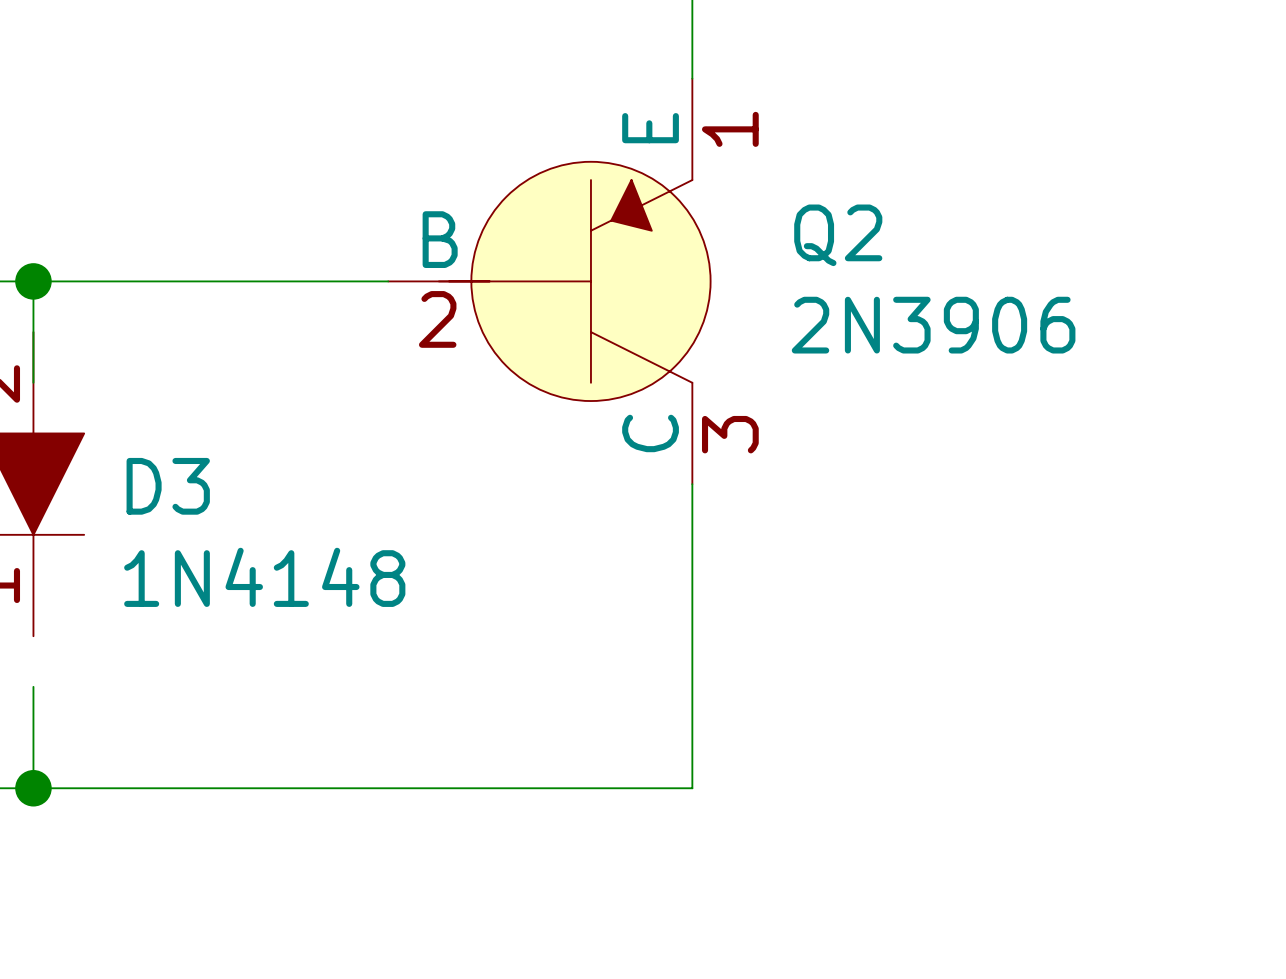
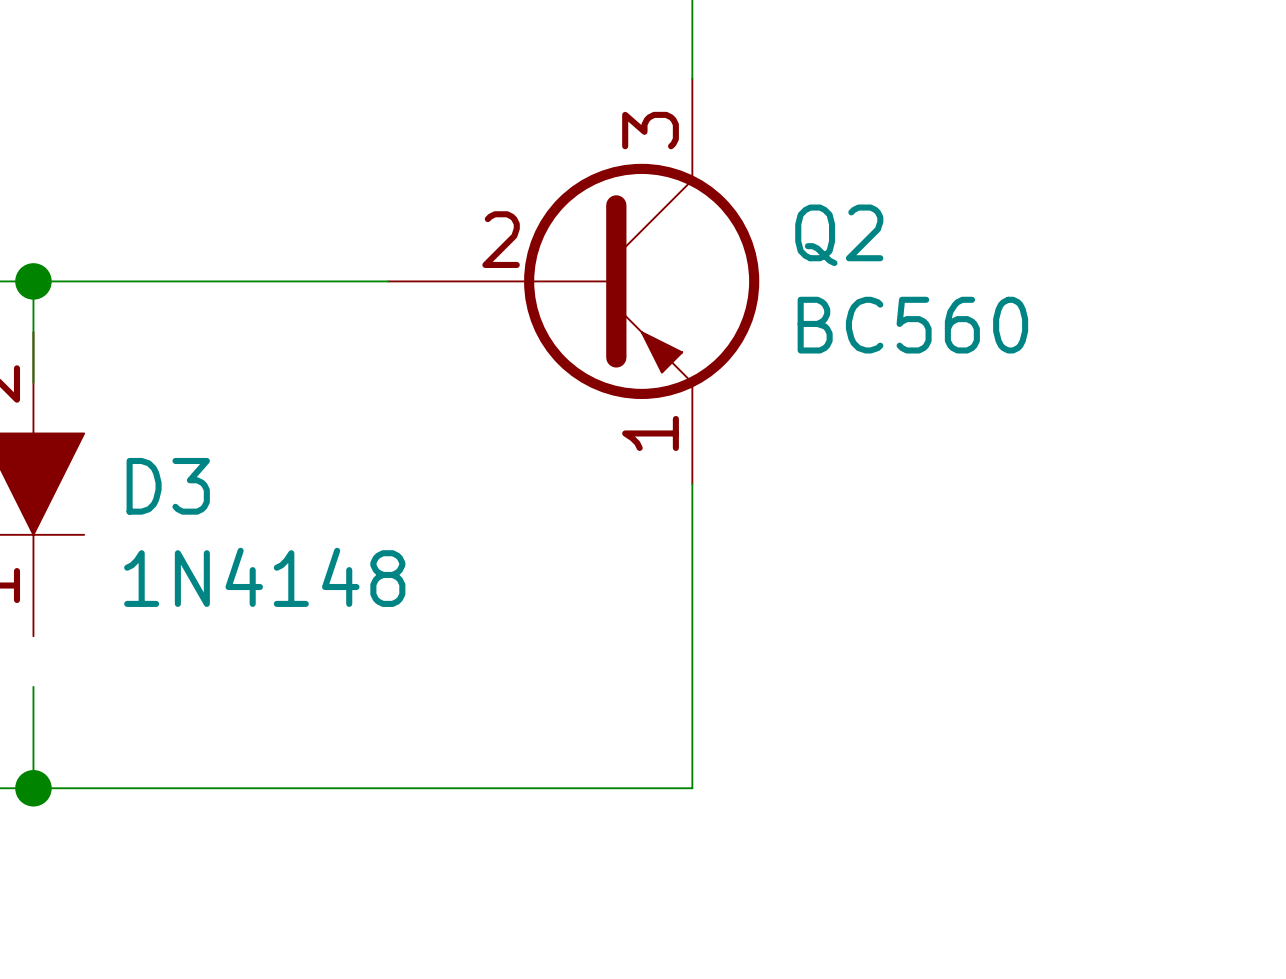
Q2 symbol: [388, 78, 711, 485] -> [388, 78, 760, 485]
Q2 value: 2N3906 (933, 325) -> BC560 (912, 325)

